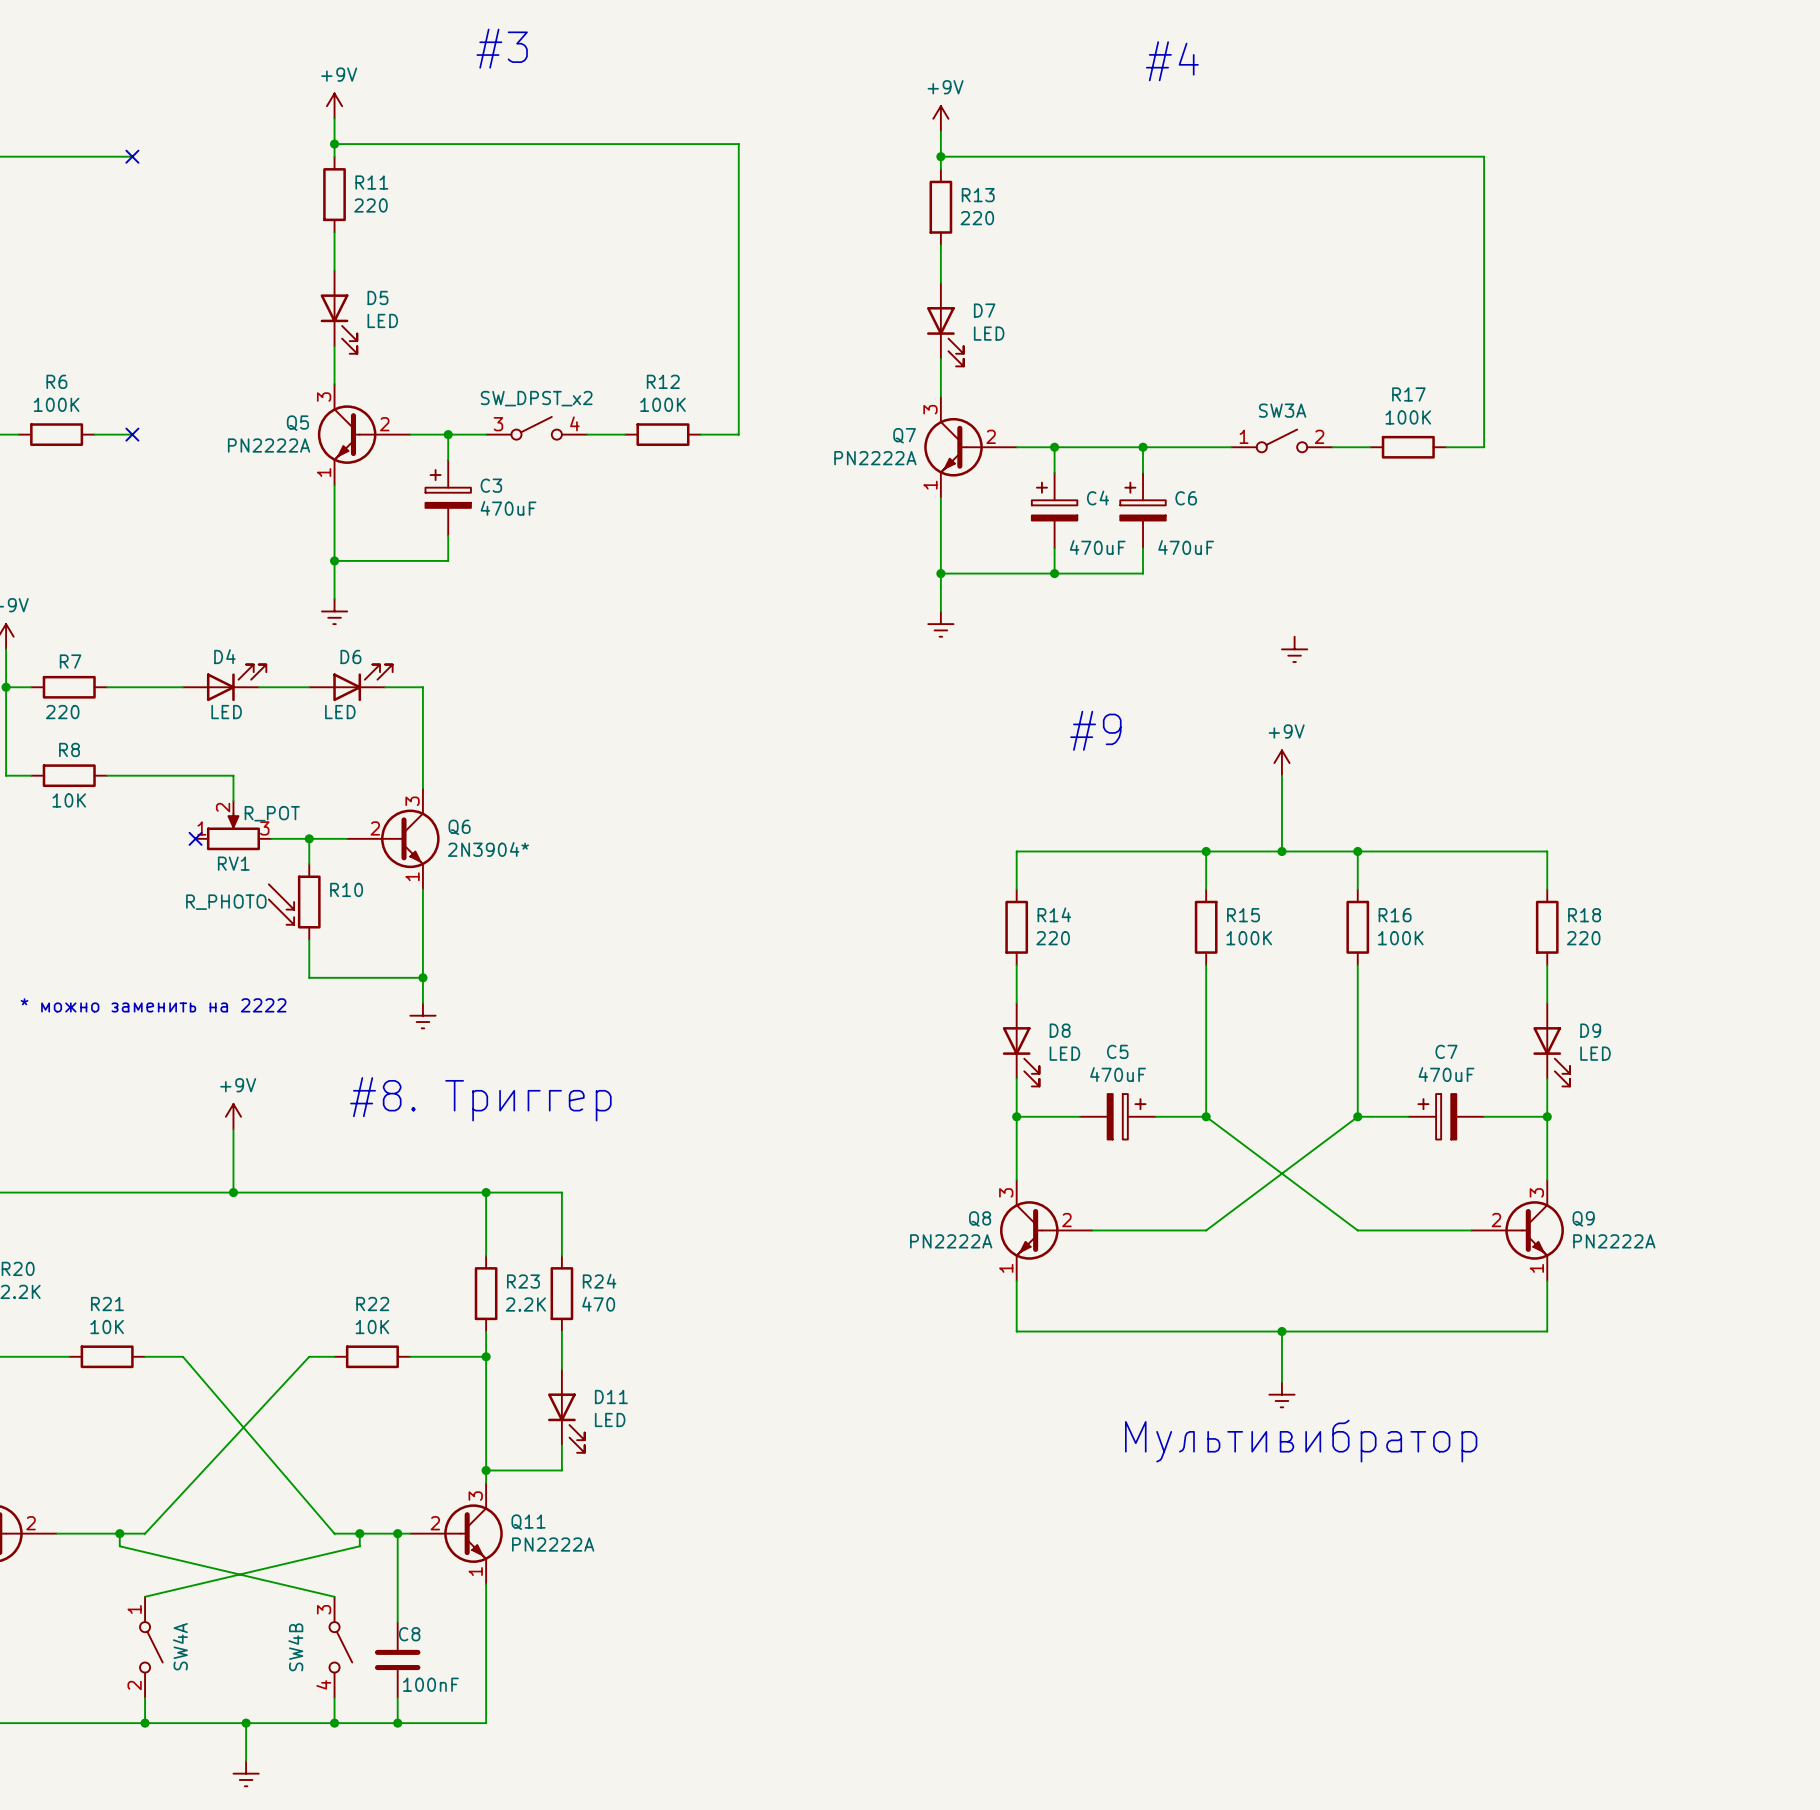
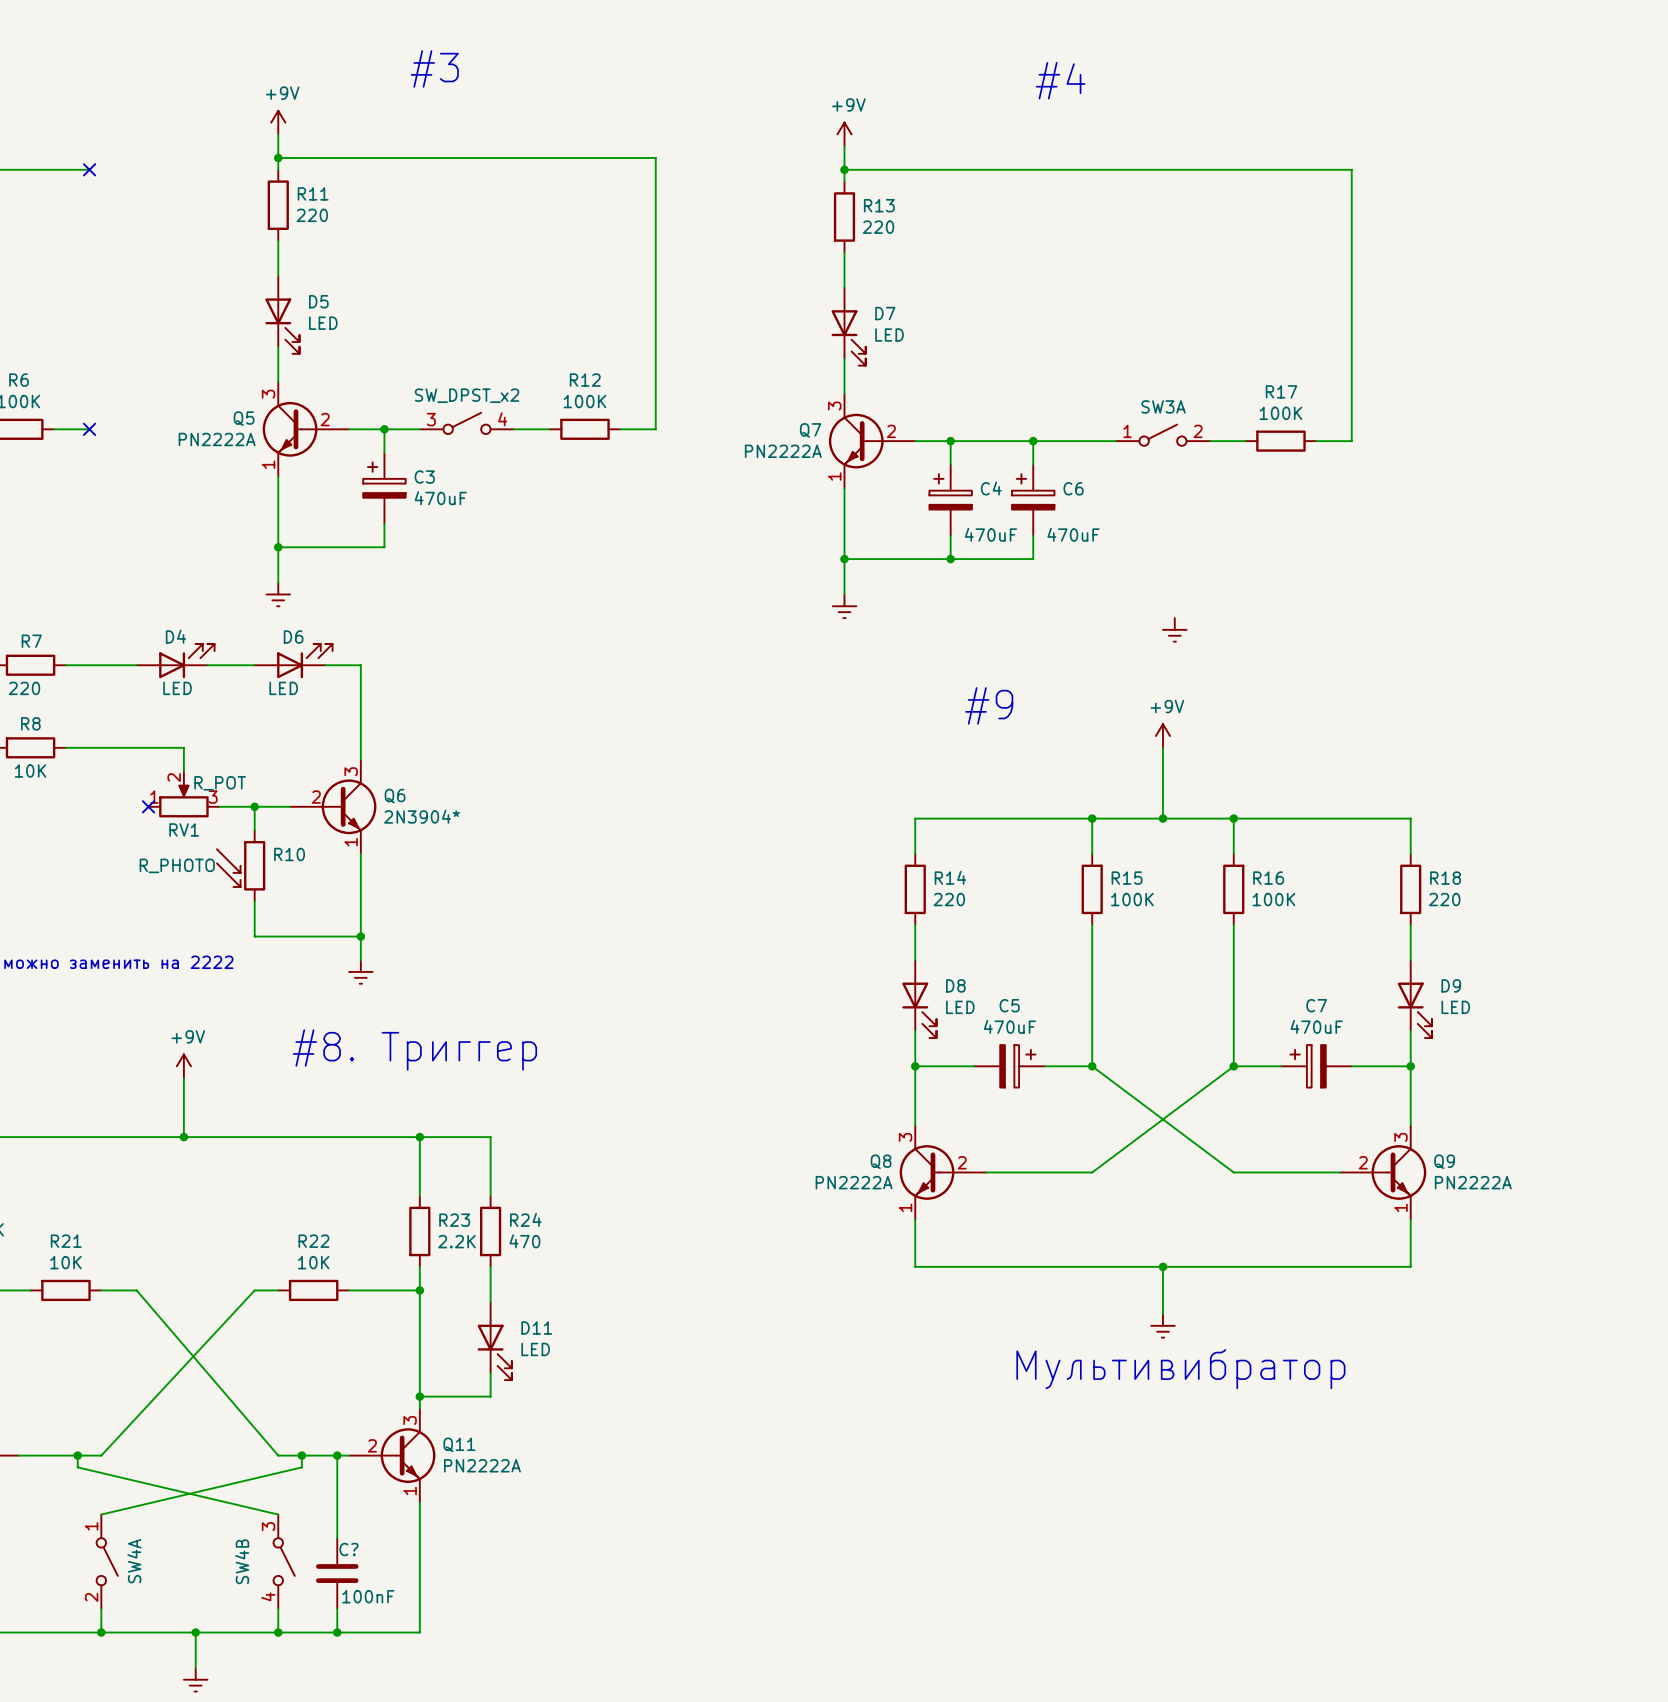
C8 name: C8 (409, 1634) -> C? (348, 1549)

